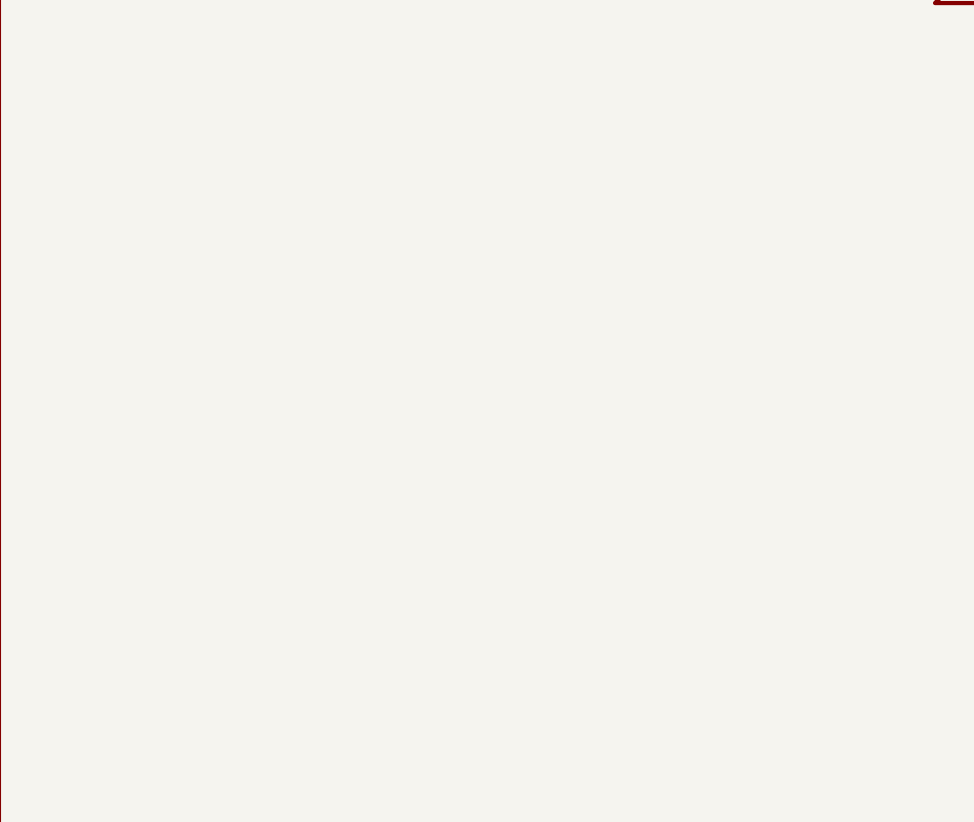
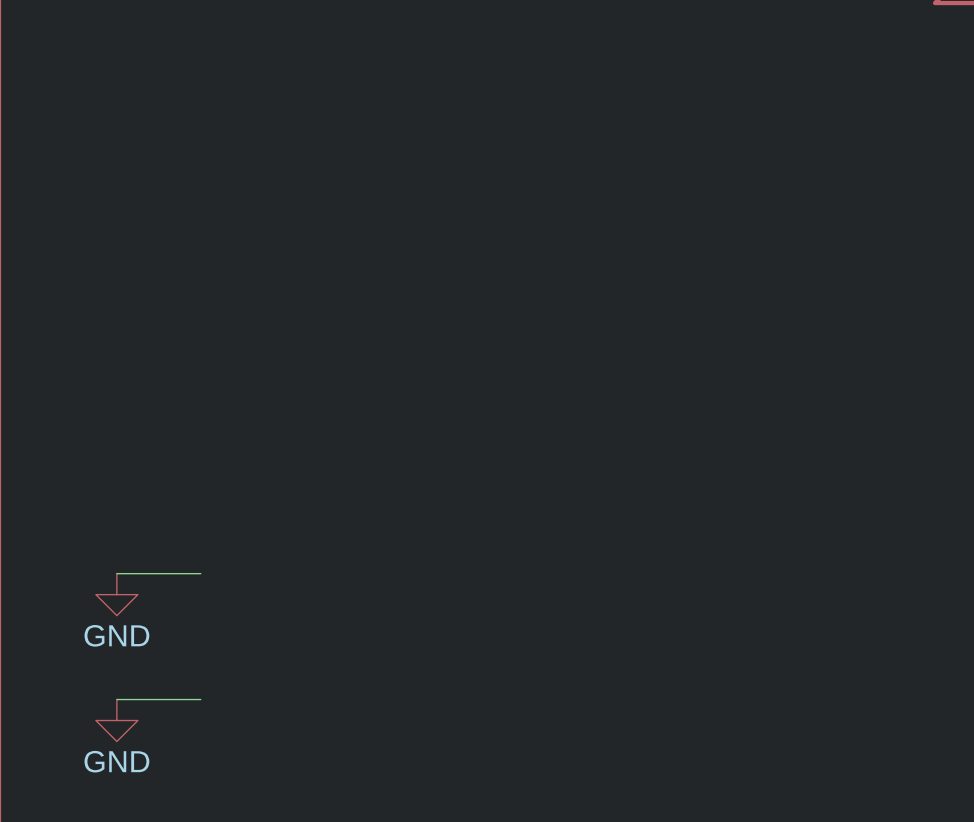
wire: none -> (116, 573) (200, 573)
power symbol: none -> GND (116, 594)
wire: none -> (116, 699) (200, 699)
power symbol: none -> GND (116, 720)

